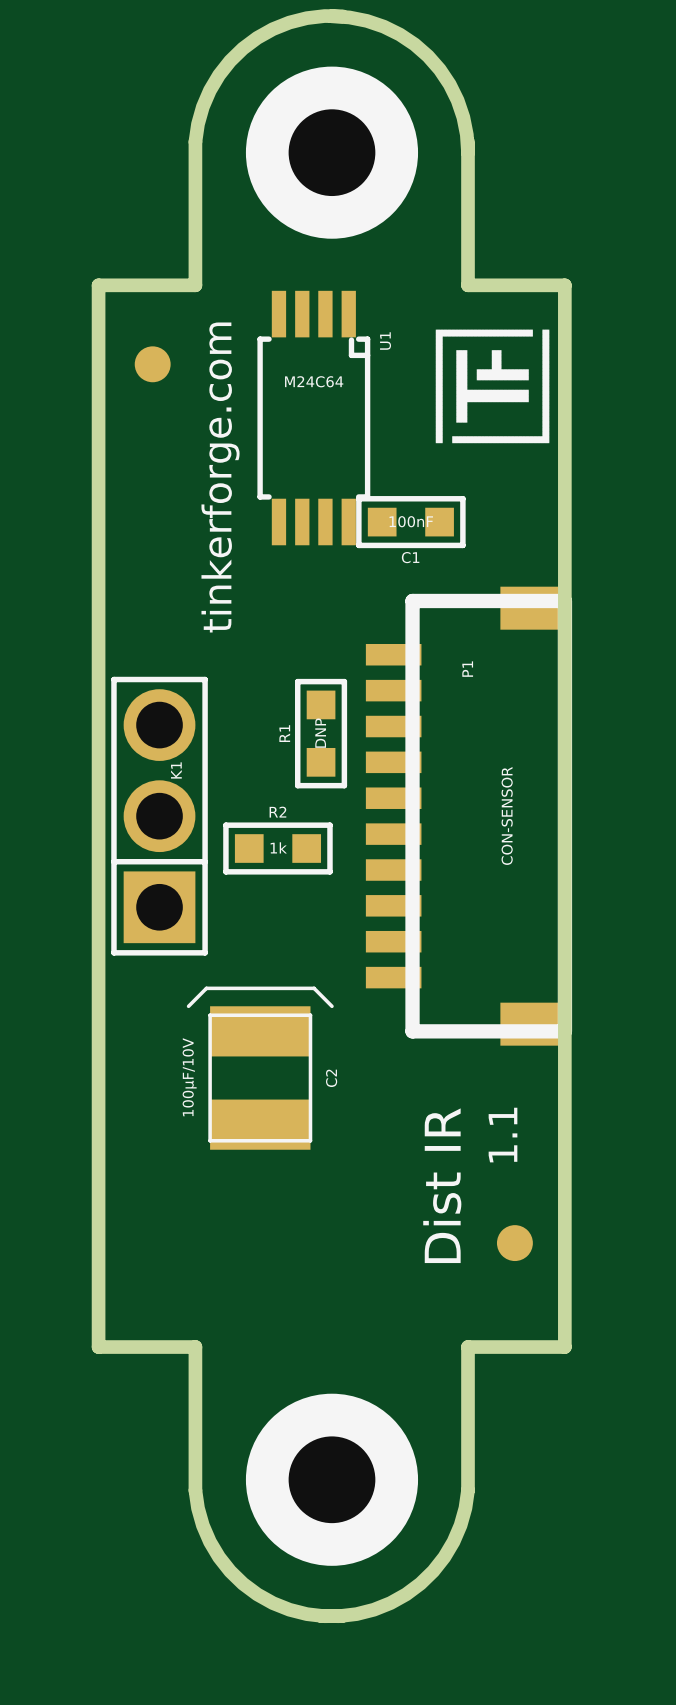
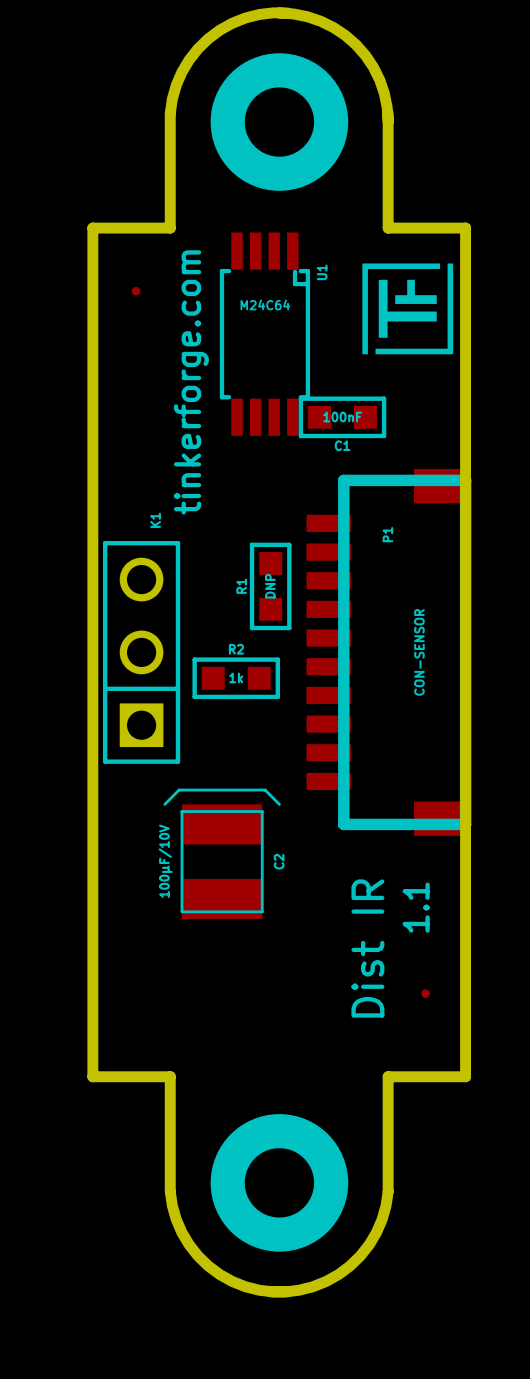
part footprint: [134, 346, 171, 383] -> [131, 286, 141, 296]
K1 footprint: [111, 676, 208, 956] -> [102, 540, 181, 764]
K1 name position: K1 (176, 770) -> K1 (155, 520)
part footprint: [496, 1225, 533, 1262] -> [421, 989, 430, 998]

